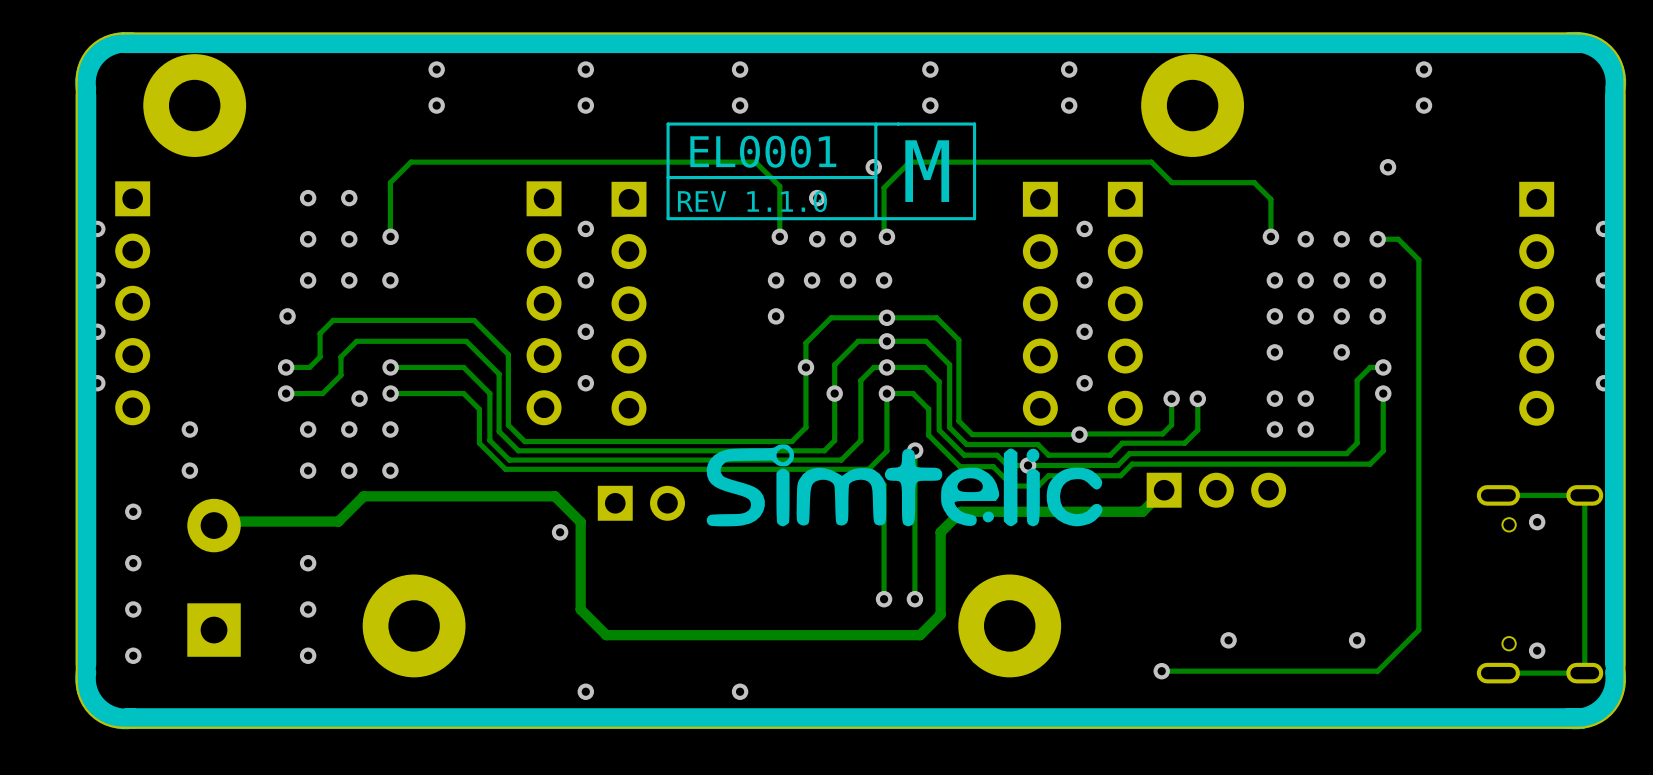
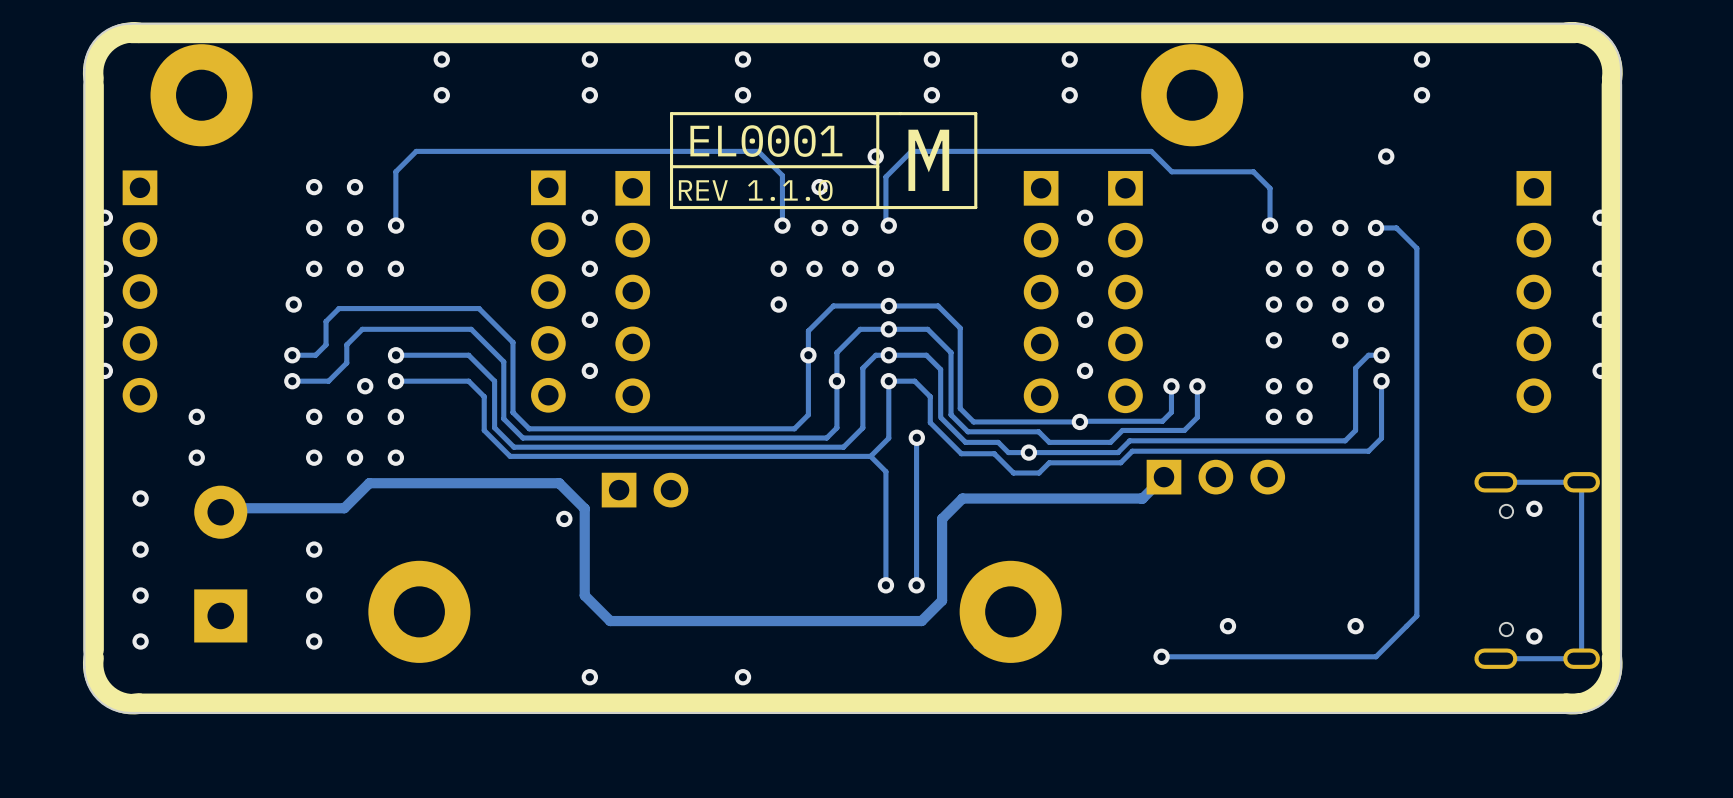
drawing: [706, 444, 1103, 527] -> none

